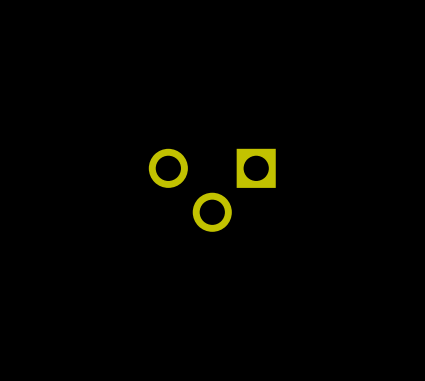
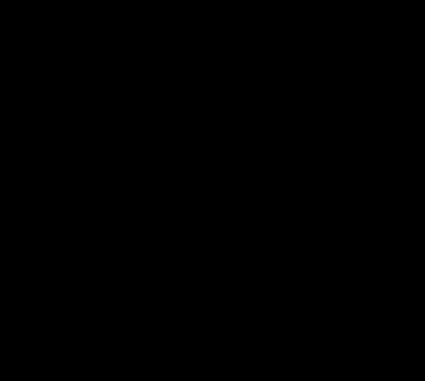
part: (212, 190) -> none

